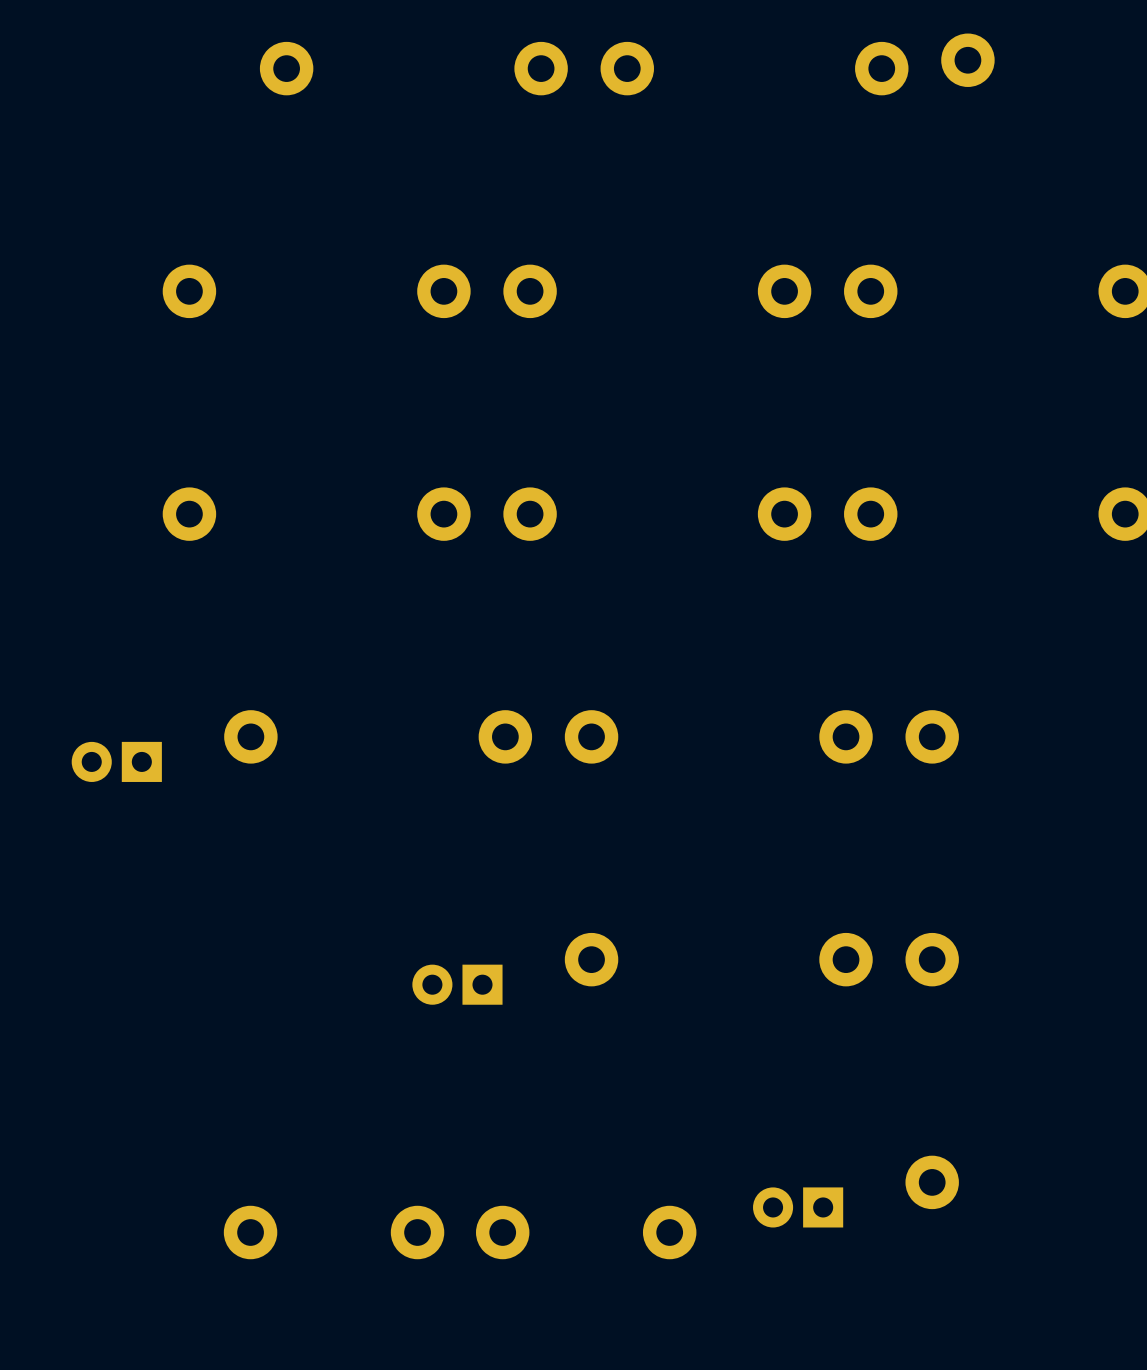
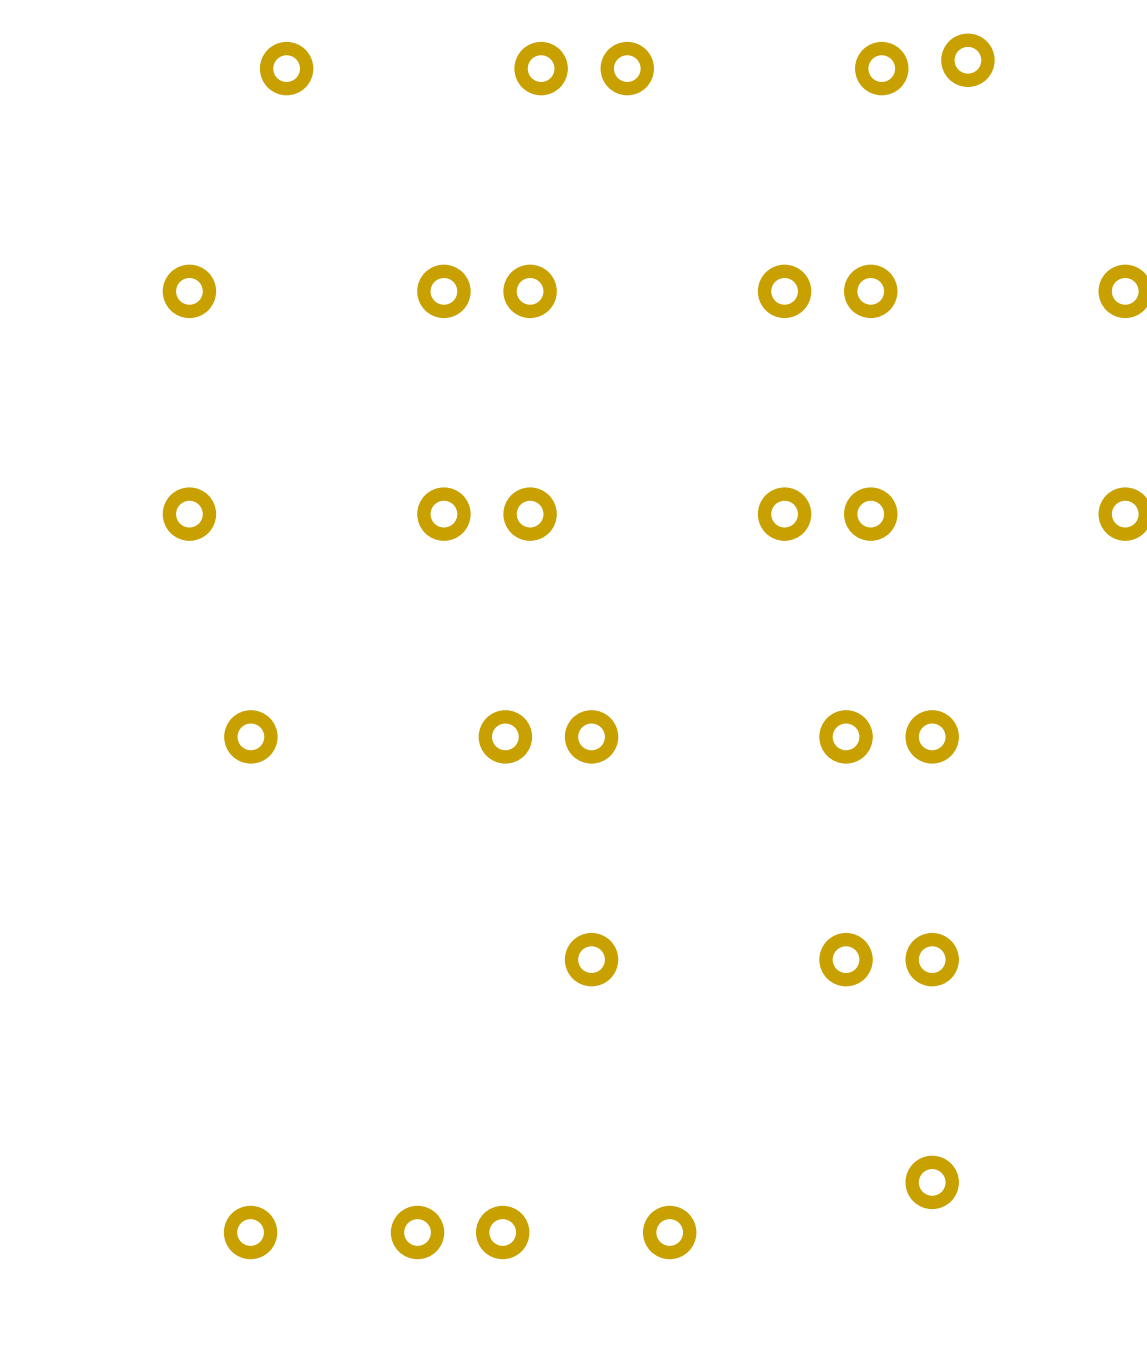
part: (116, 761) -> none
part: (457, 984) -> none
part: (798, 1207) -> none

